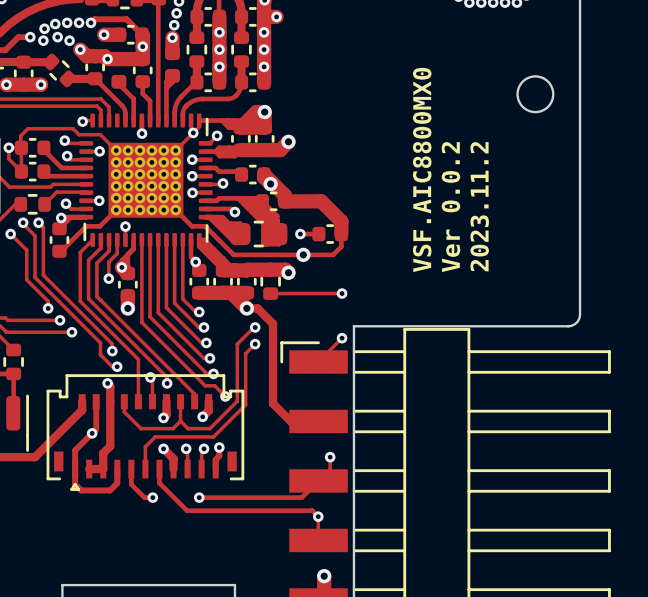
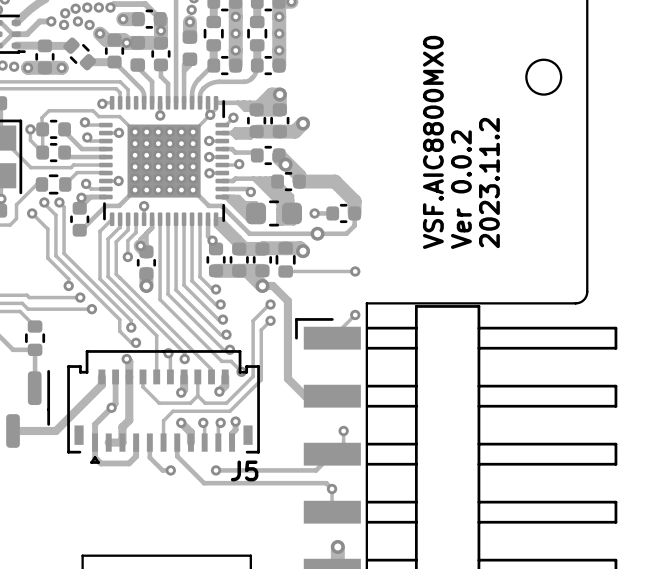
J5 name: none -> J5 (244, 470)

